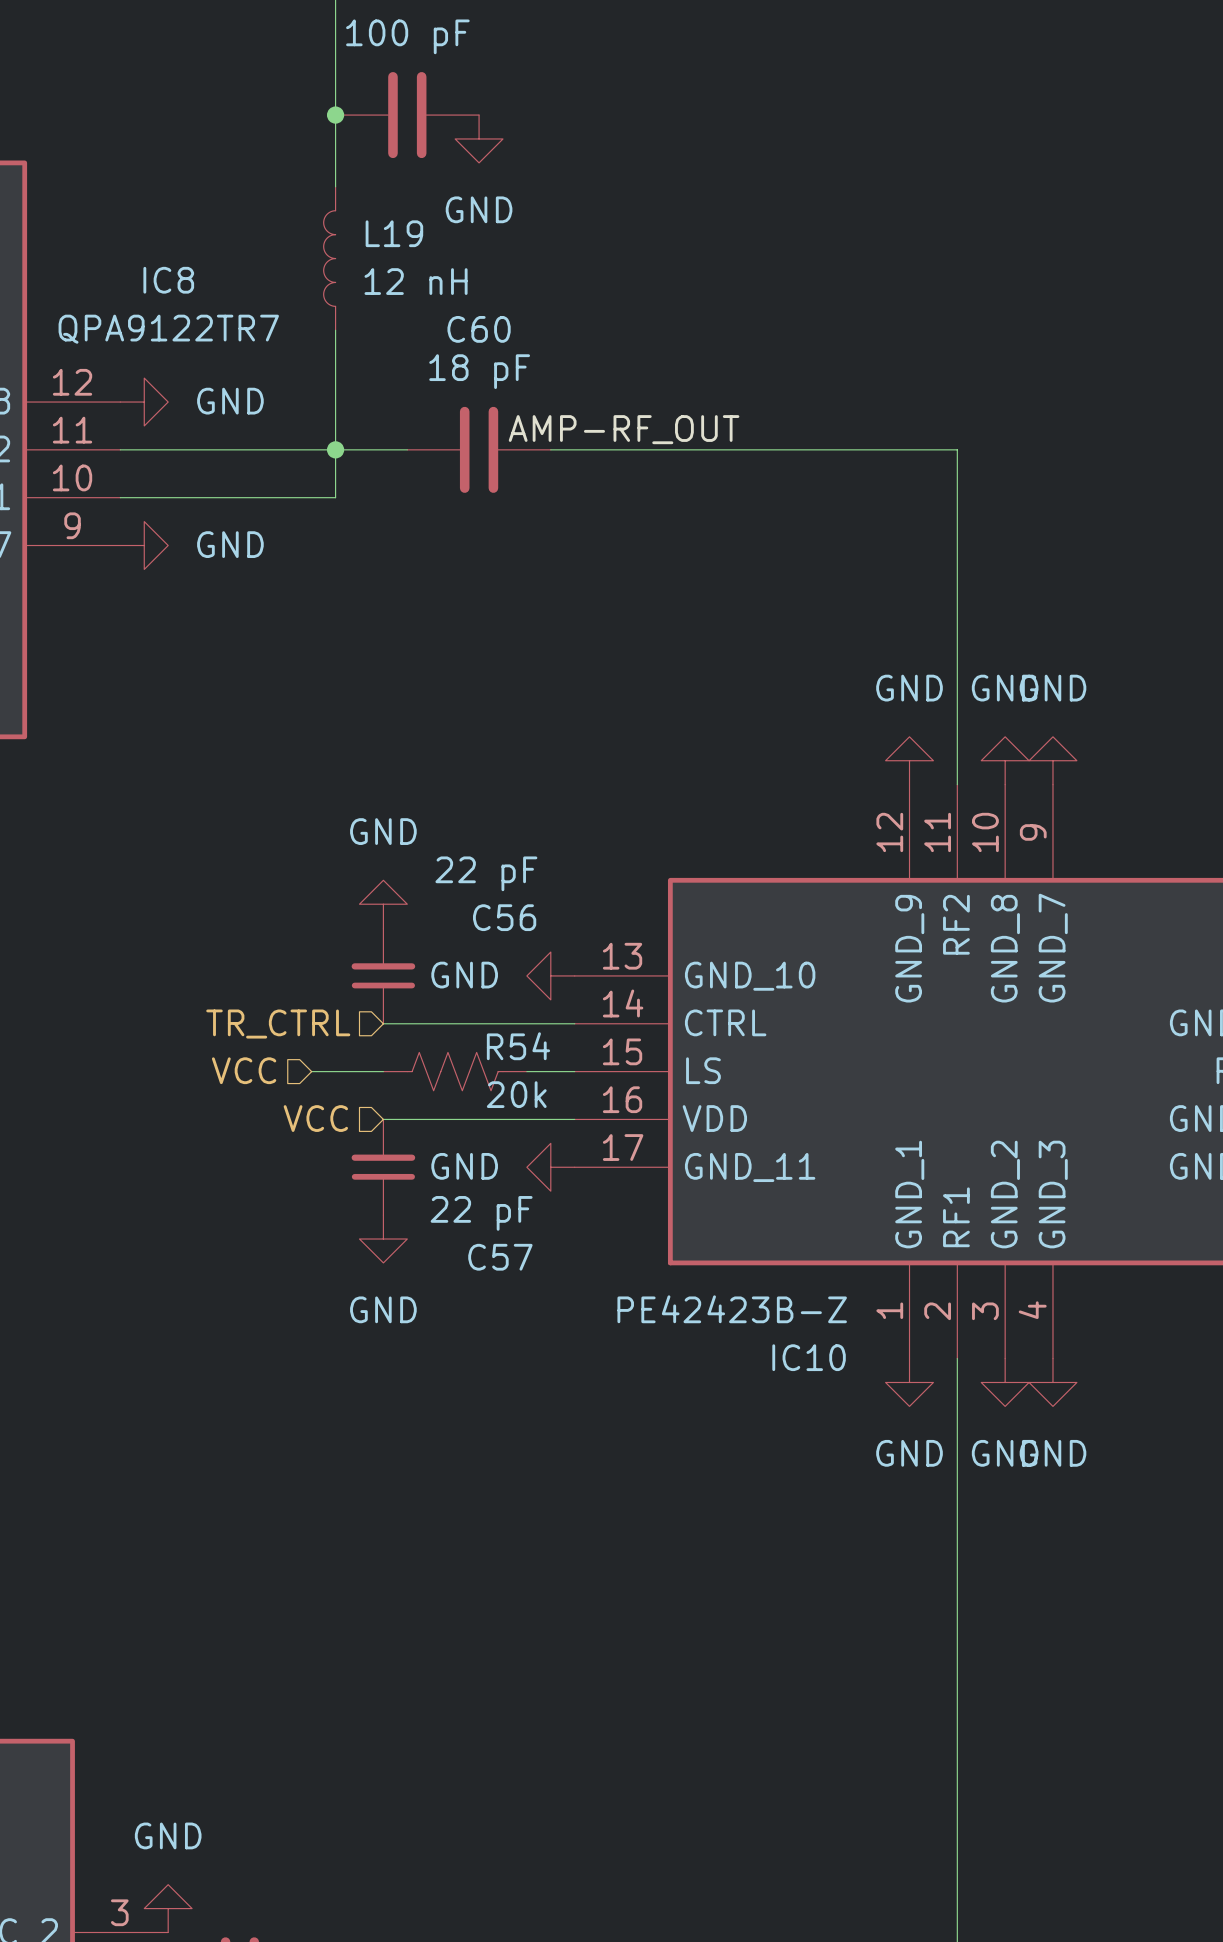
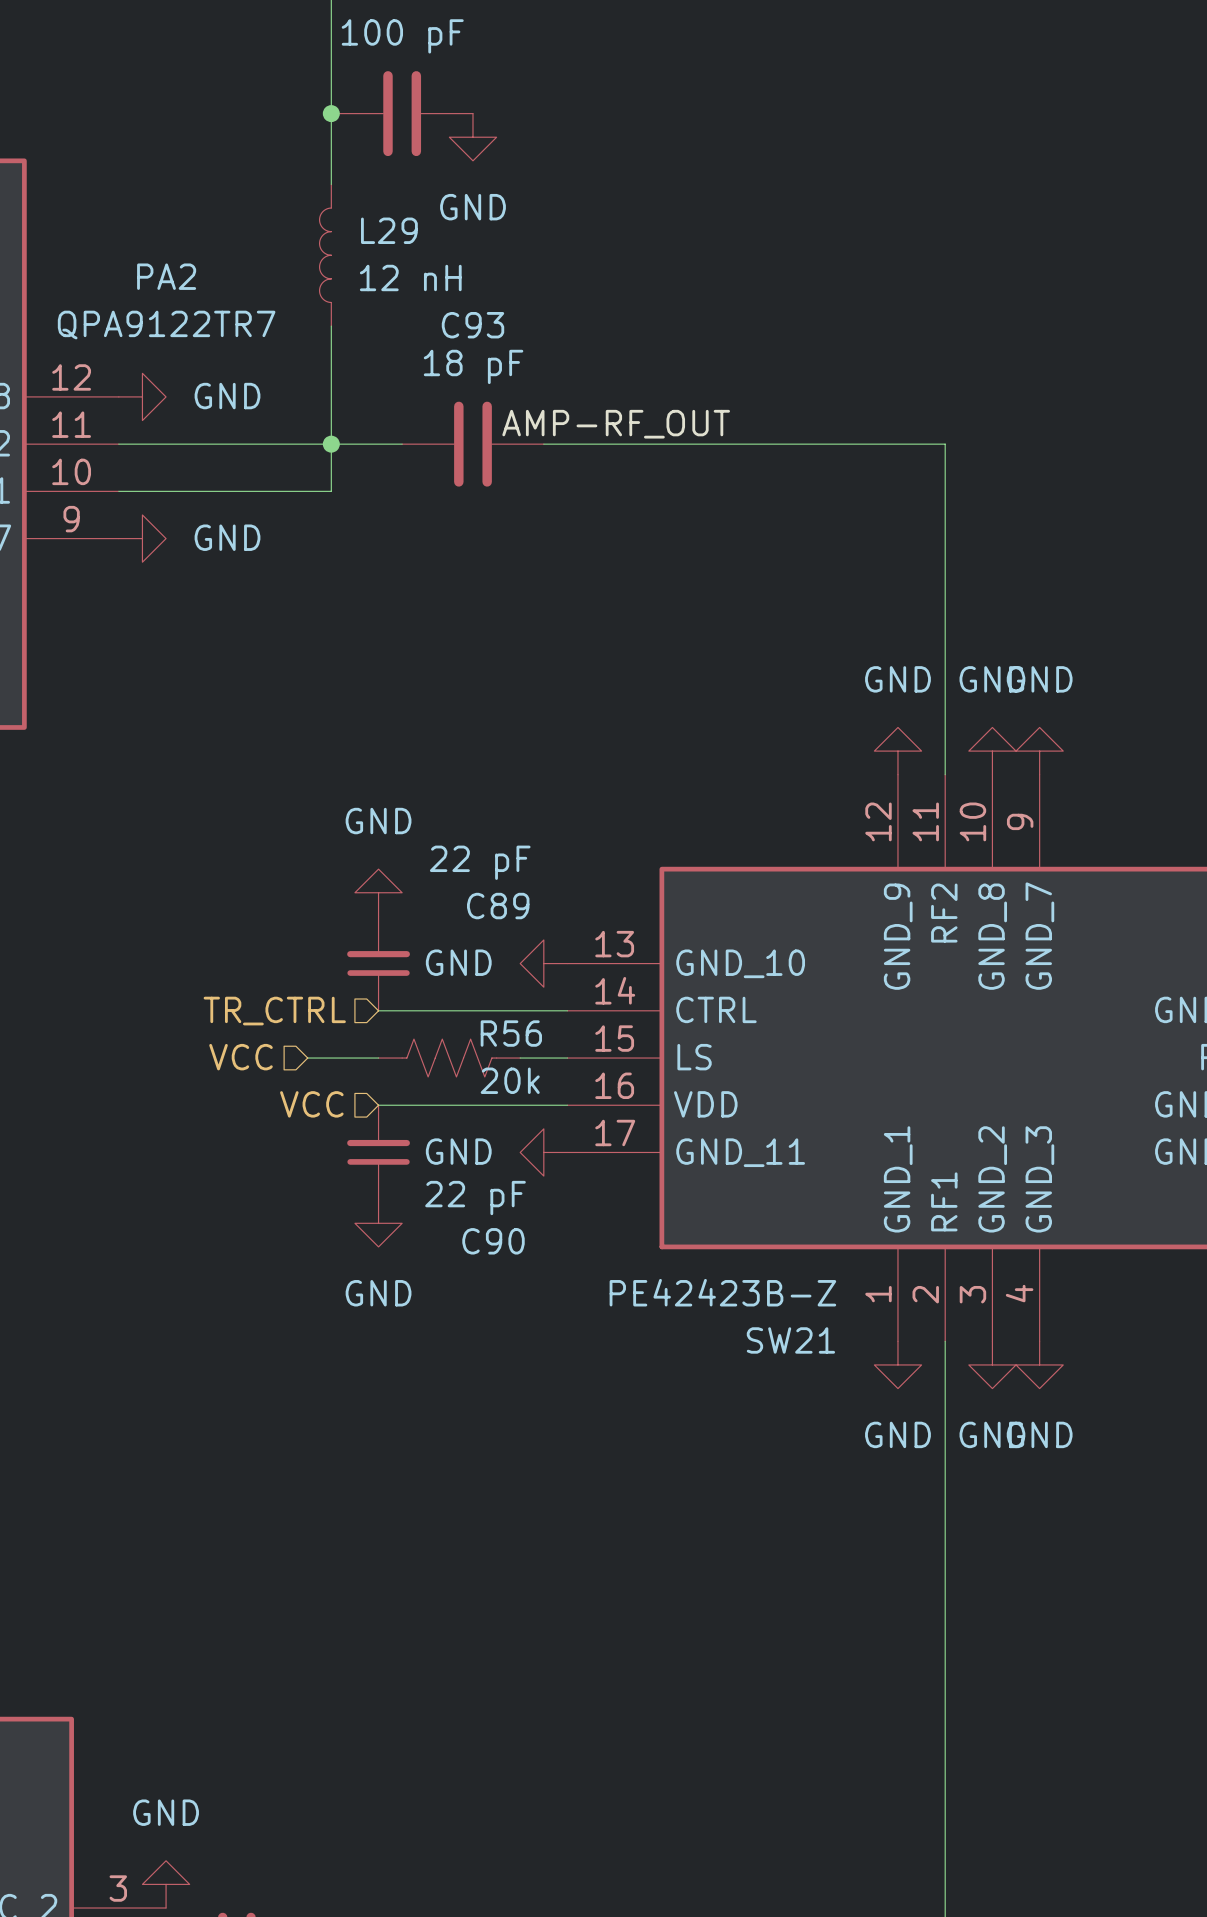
L19 name: L19 (394, 233) -> L29 (389, 230)
IC8 name: IC8 (168, 280) -> PA2 (166, 276)
C60 name: C60 (479, 329) -> C93 (472, 325)
C56 name: C56 (504, 917) -> C89 (498, 906)
R54 name: R54 (518, 1046) -> R56 (511, 1033)
C57 name: C57 (500, 1257) -> C90 (493, 1241)
IC10 name: IC10 (809, 1357) -> SW21 (790, 1340)

